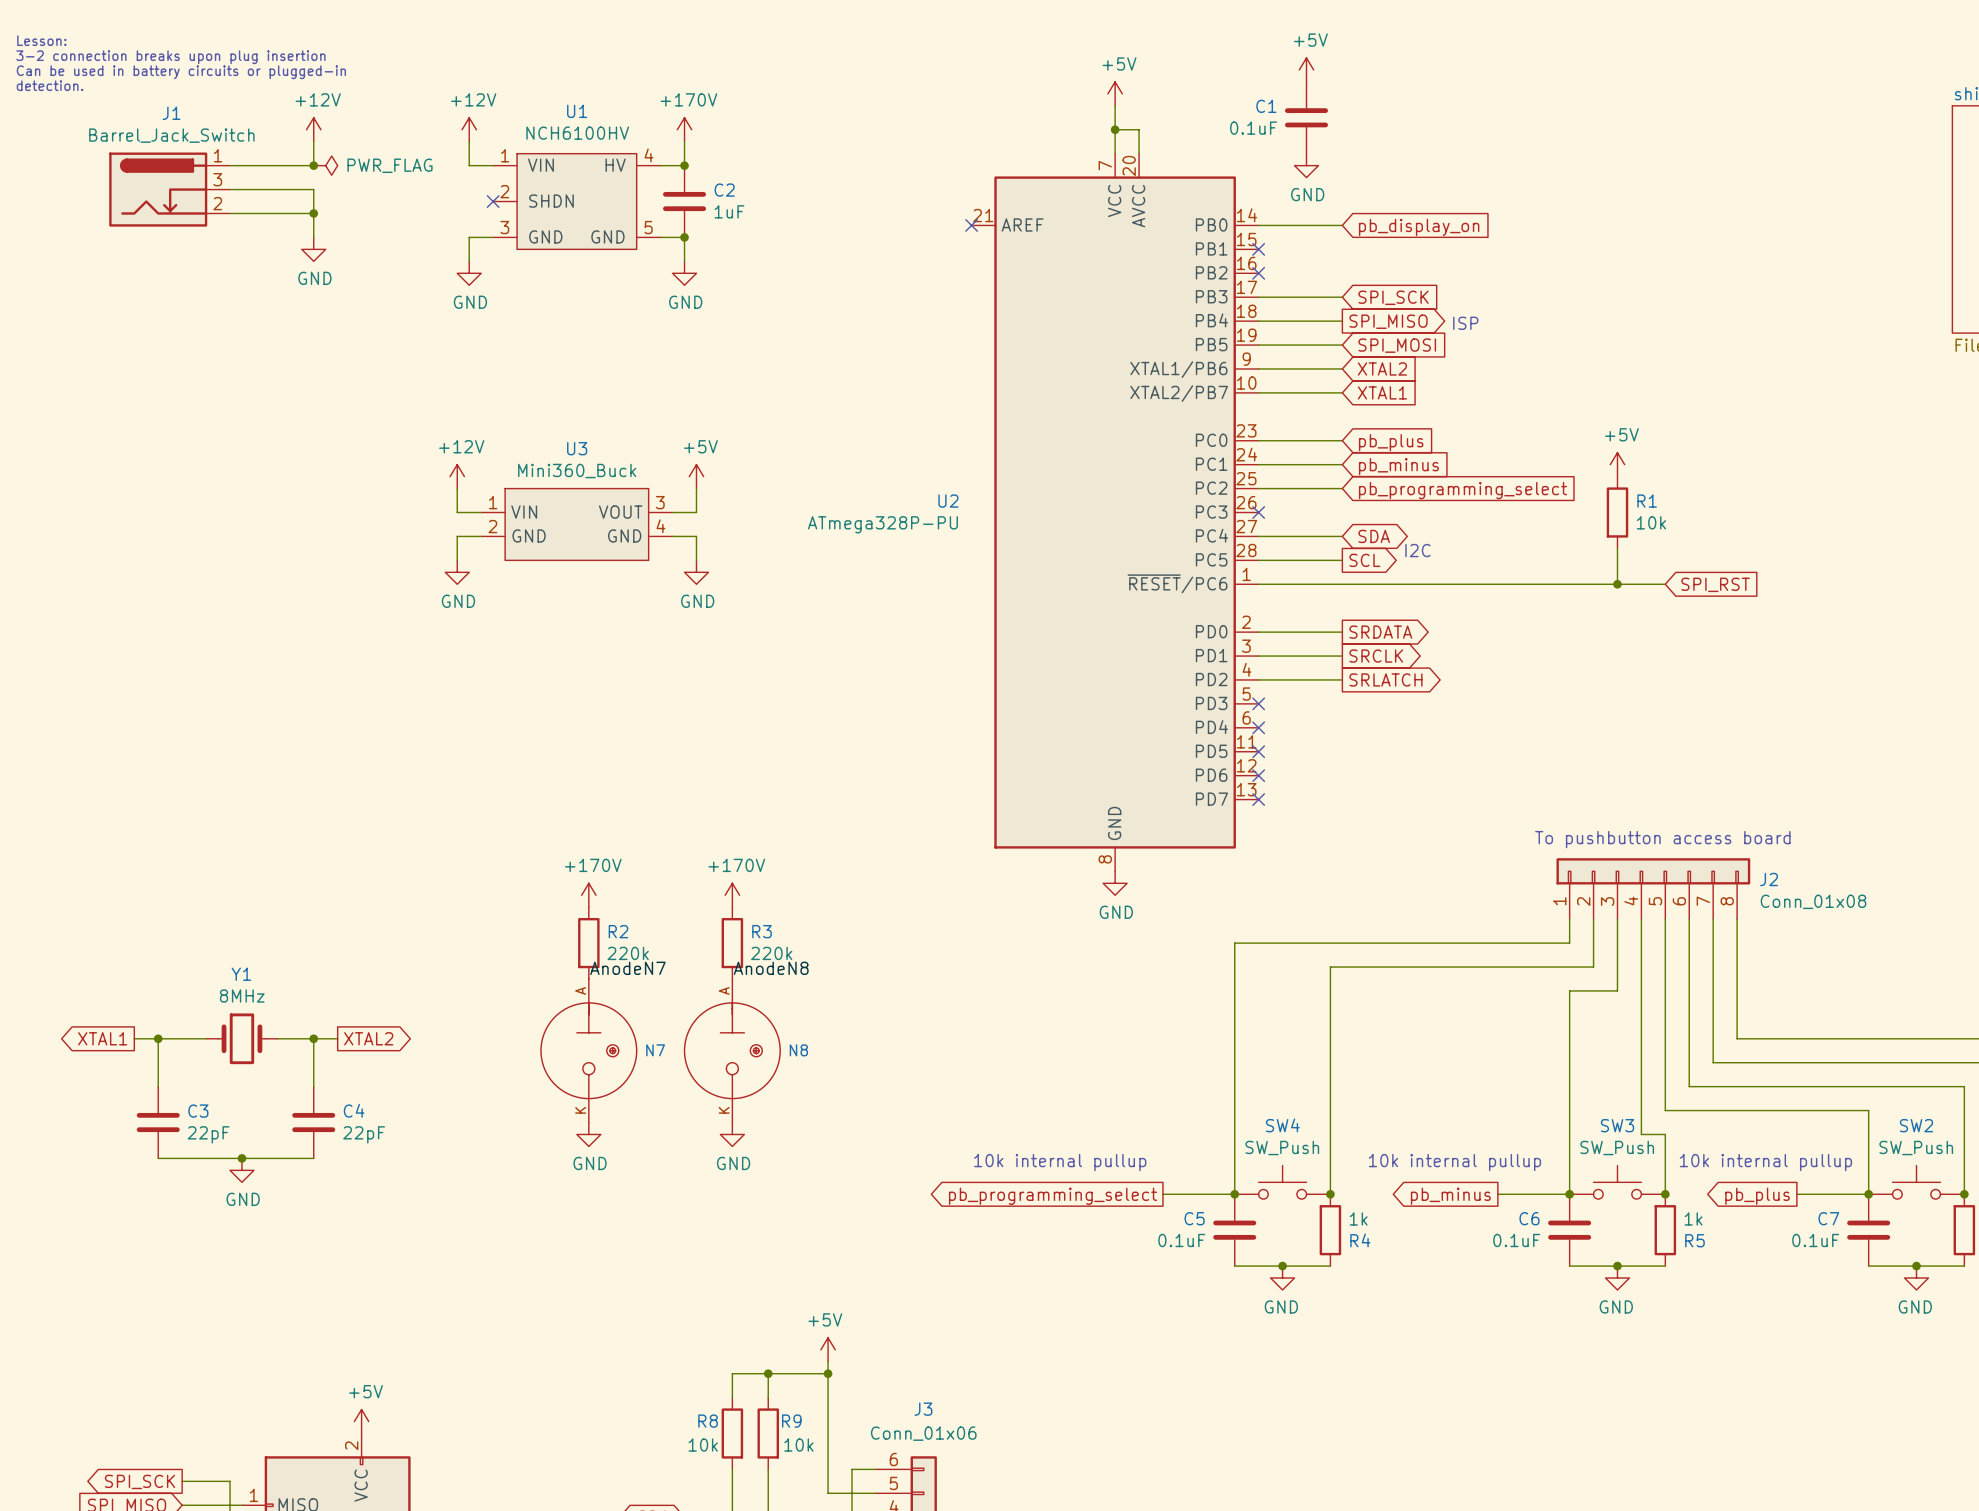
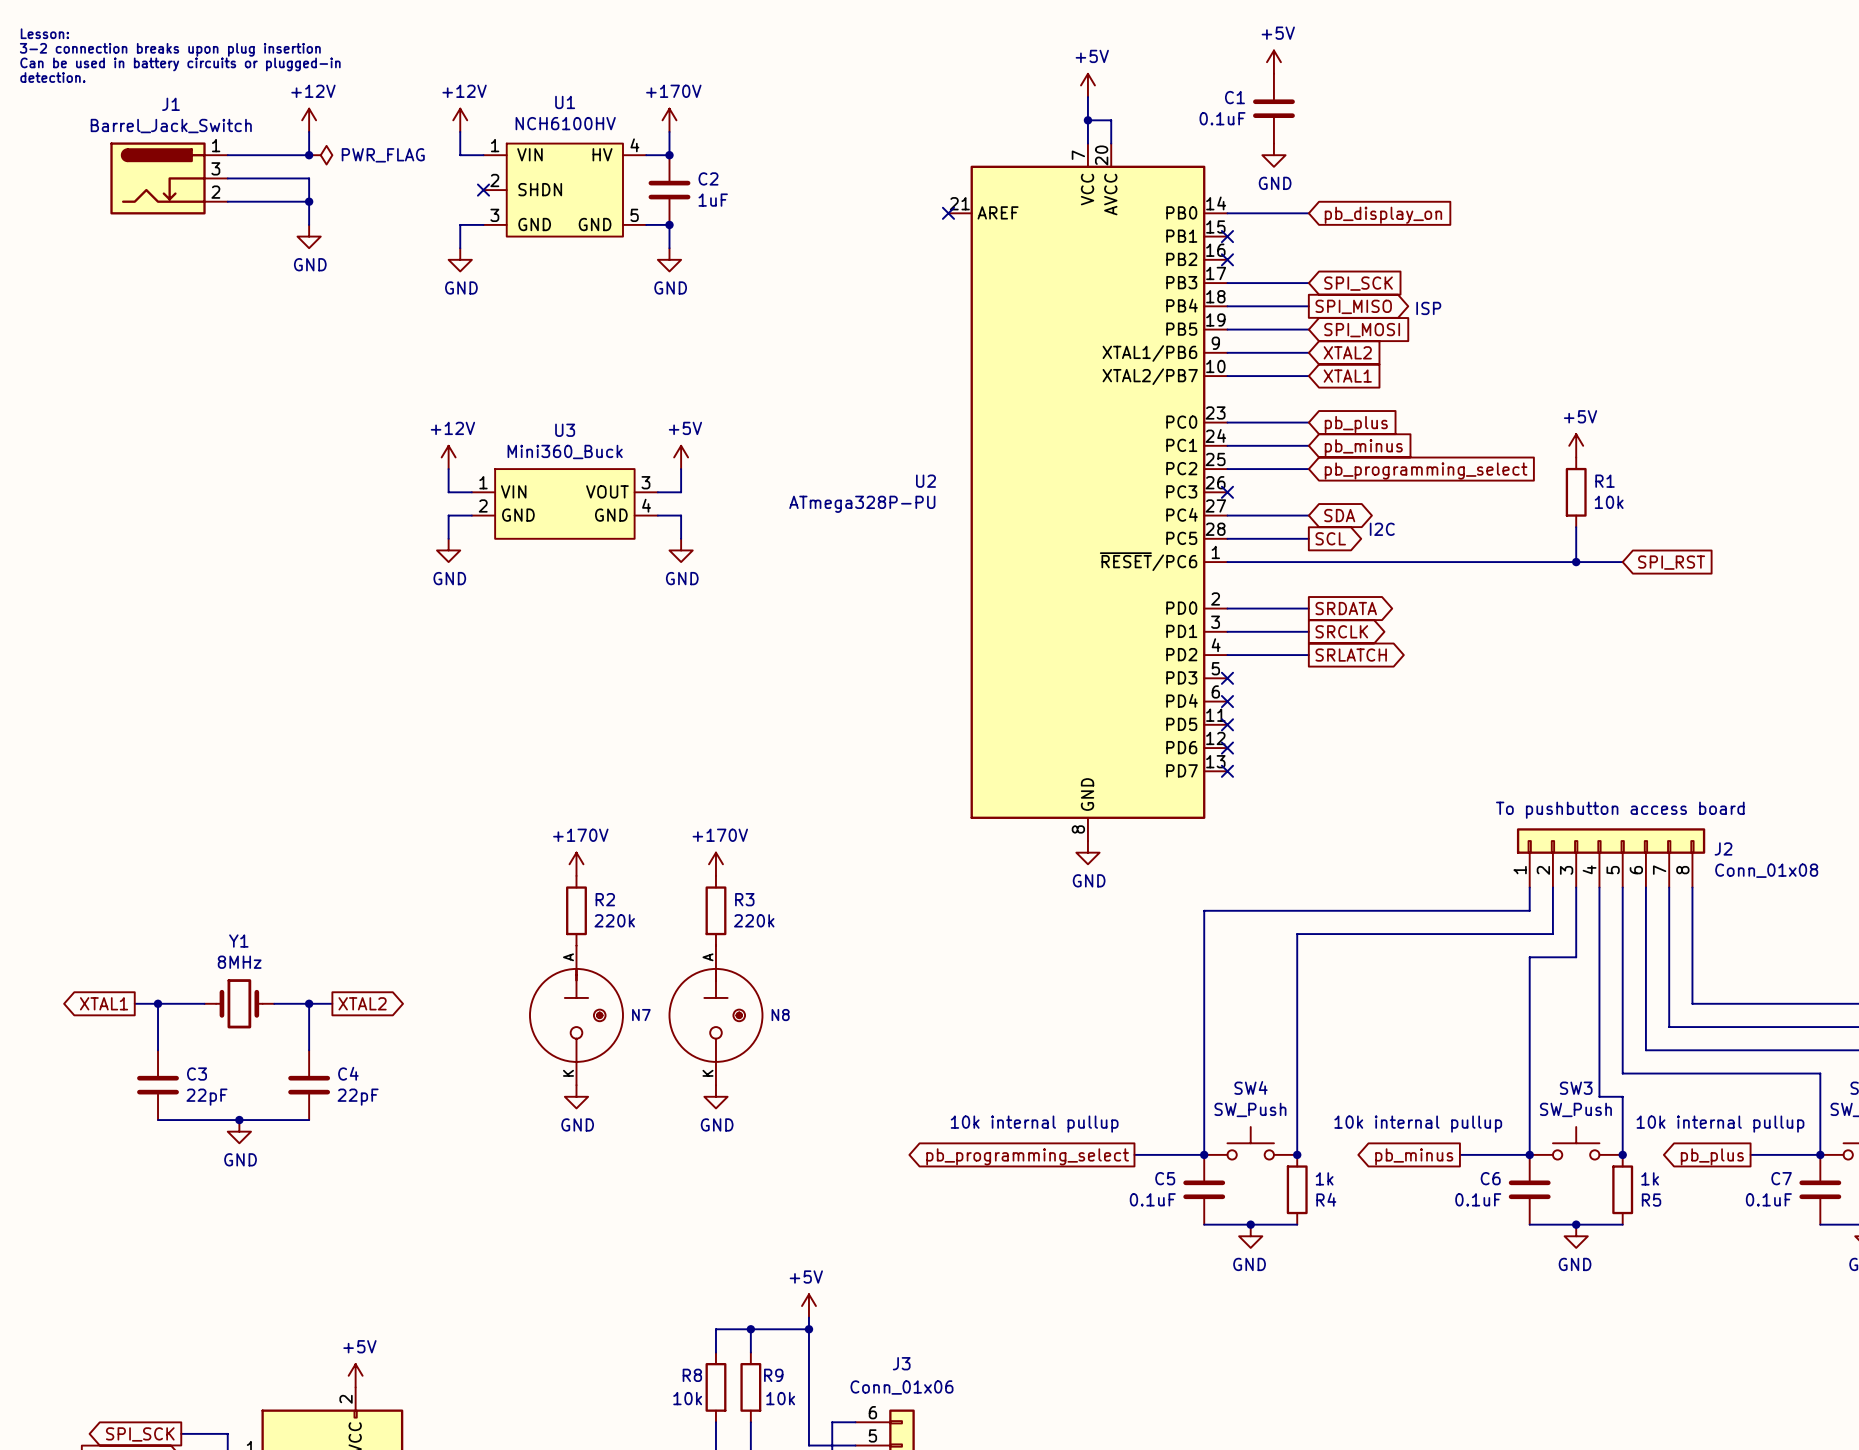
label: AnodeN7 (627, 968) -> none
label: AnodeN8 (771, 968) -> none

